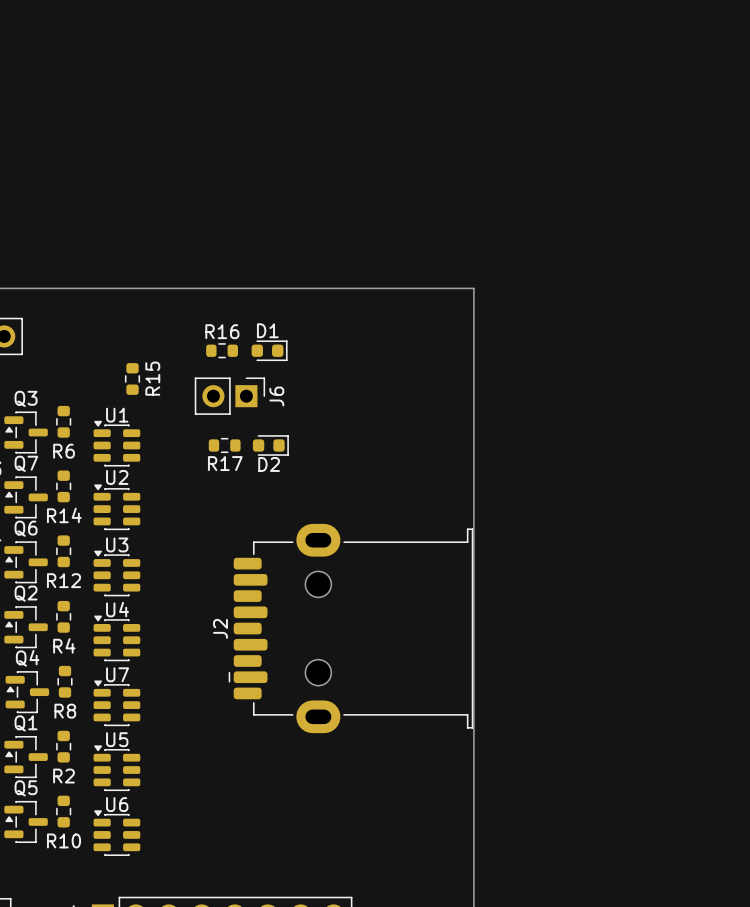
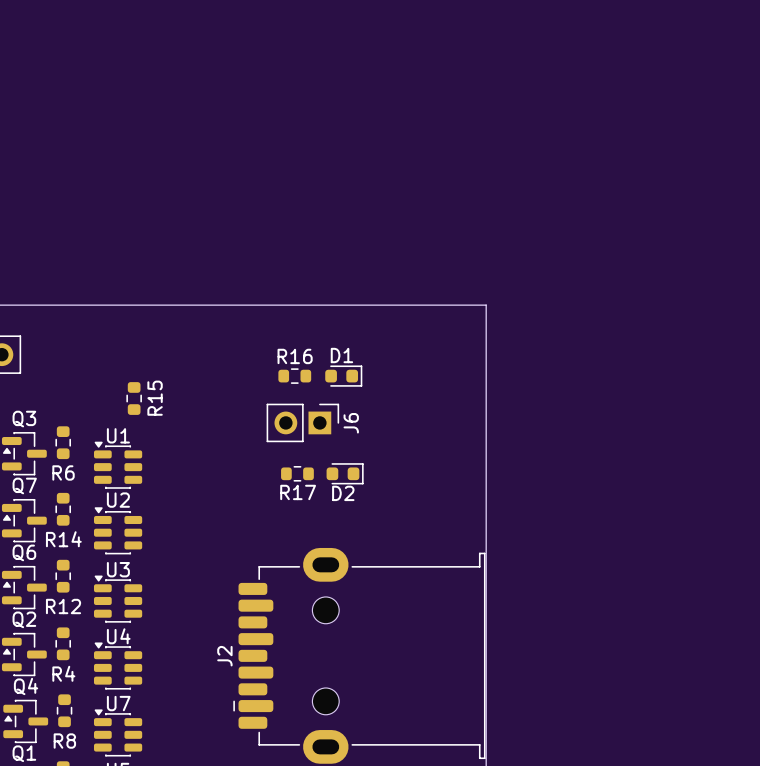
R16 position: (222, 350) -> (294, 376)
D1 position: (269, 350) -> (343, 376)
J6 position: (229, 396) -> (302, 422)
R17 position: (224, 445) -> (297, 473)
D2 position: (270, 445) -> (345, 473)

